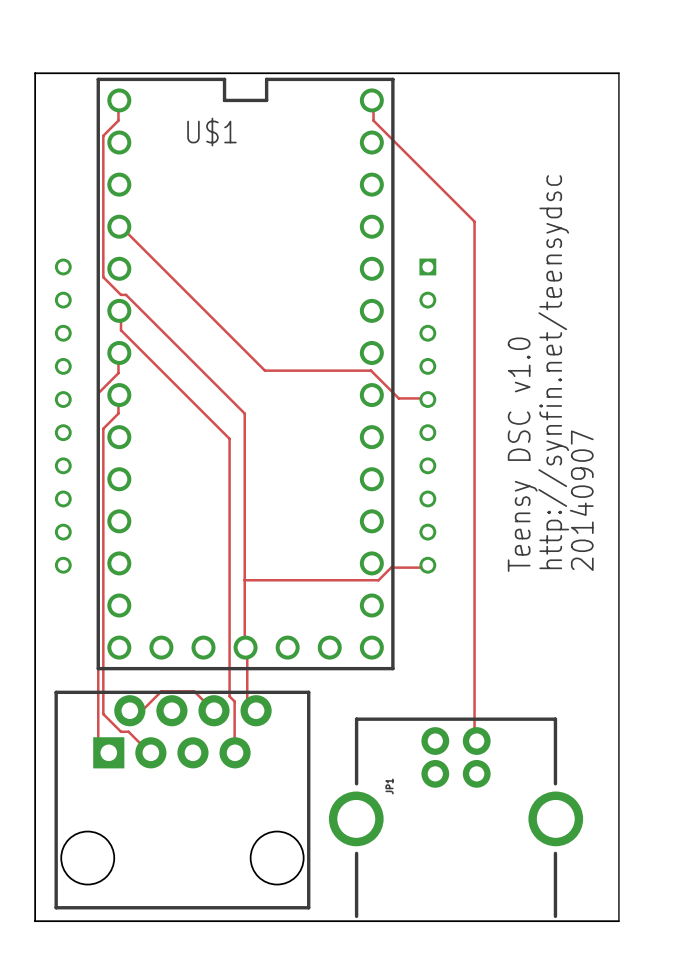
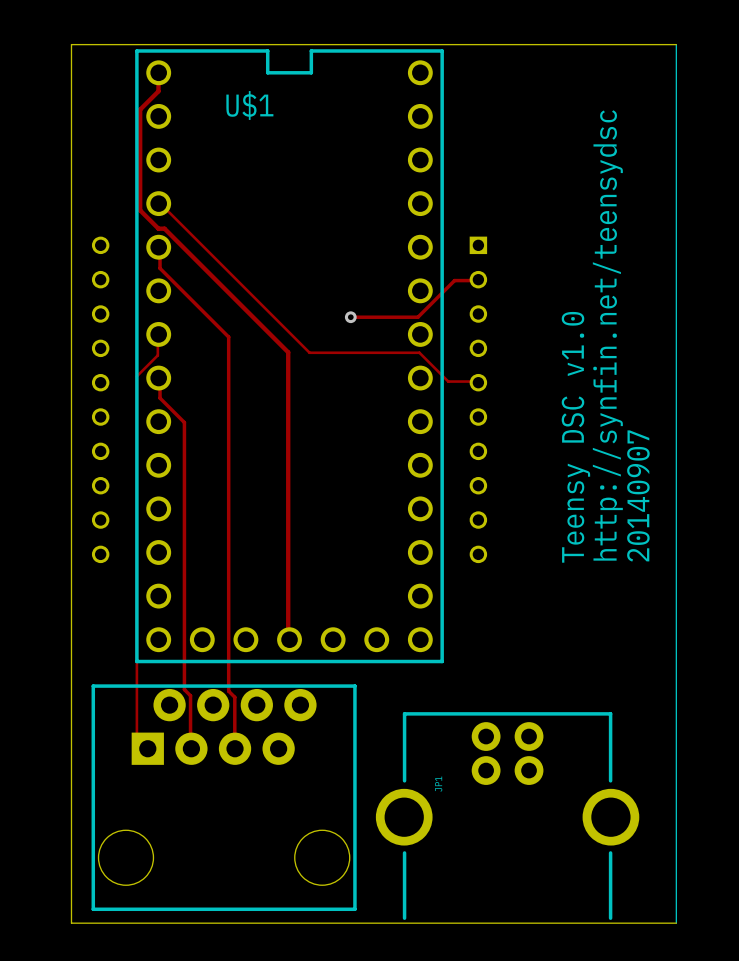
track: (119, 100) (118, 120) (103, 135) (103, 277) (120, 294) (126, 294) (244, 413) (244, 645) (247, 648) (247, 701) (256, 710) -> (158, 73) (158, 91) (140, 109) (140, 210) (158, 228) (164, 228) (288, 352) (289, 639)
track: (371, 100) (373, 100) (373, 120) (474, 221) (474, 739) (476, 741) -> none
track: none -> (158, 247) (160, 268) (228, 337) (228, 691) (234, 697) (235, 748)
track: none -> (478, 279) (454, 280) (417, 317) (350, 317)
track: (119, 310) (120, 312) (120, 330) (229, 438) (229, 696) (234, 701) (235, 752) -> none
via: none -> (350, 317)
track: (119, 395) (118, 413) (103, 428) (103, 714) (120, 731) (128, 731) (150, 752) -> (158, 378) (160, 398) (184, 422) (184, 689) (190, 695) (191, 748)
track: (427, 565) (426, 567) (391, 567) (378, 580) (244, 580) -> none
track: (129, 710) (131, 709) (143, 709) (161, 691) (194, 691) (214, 710) -> none

